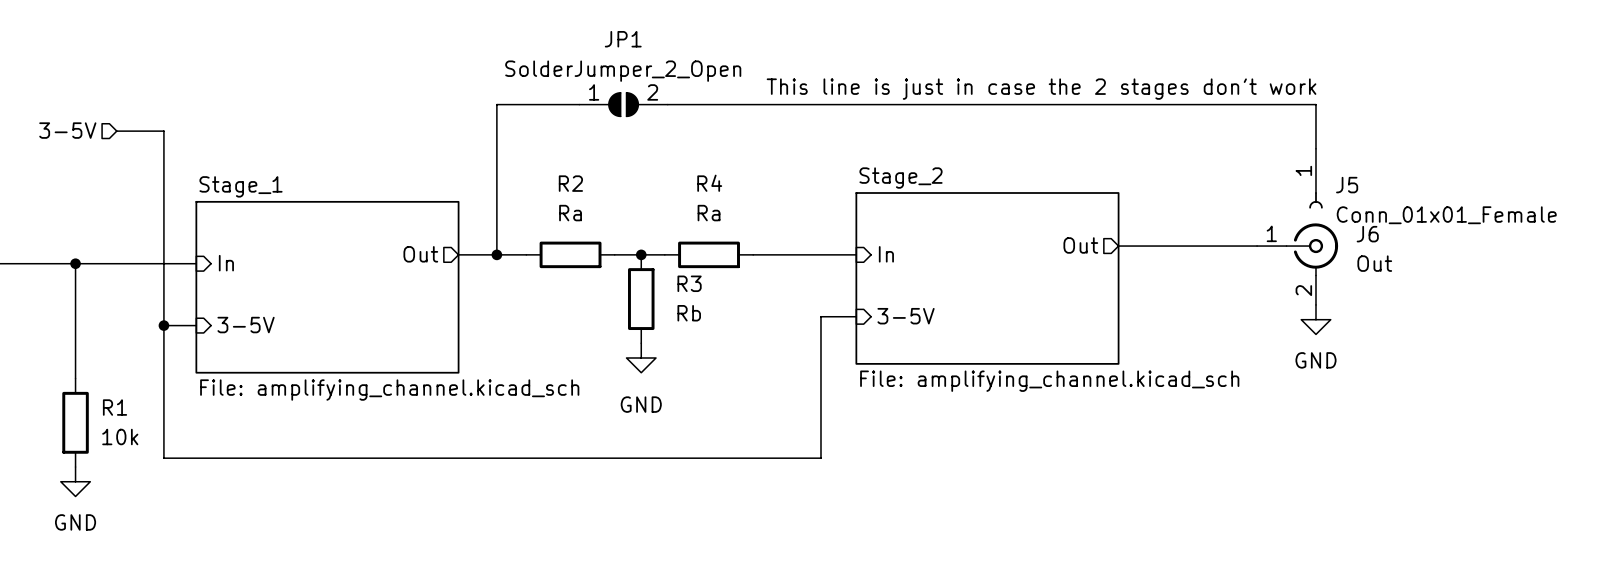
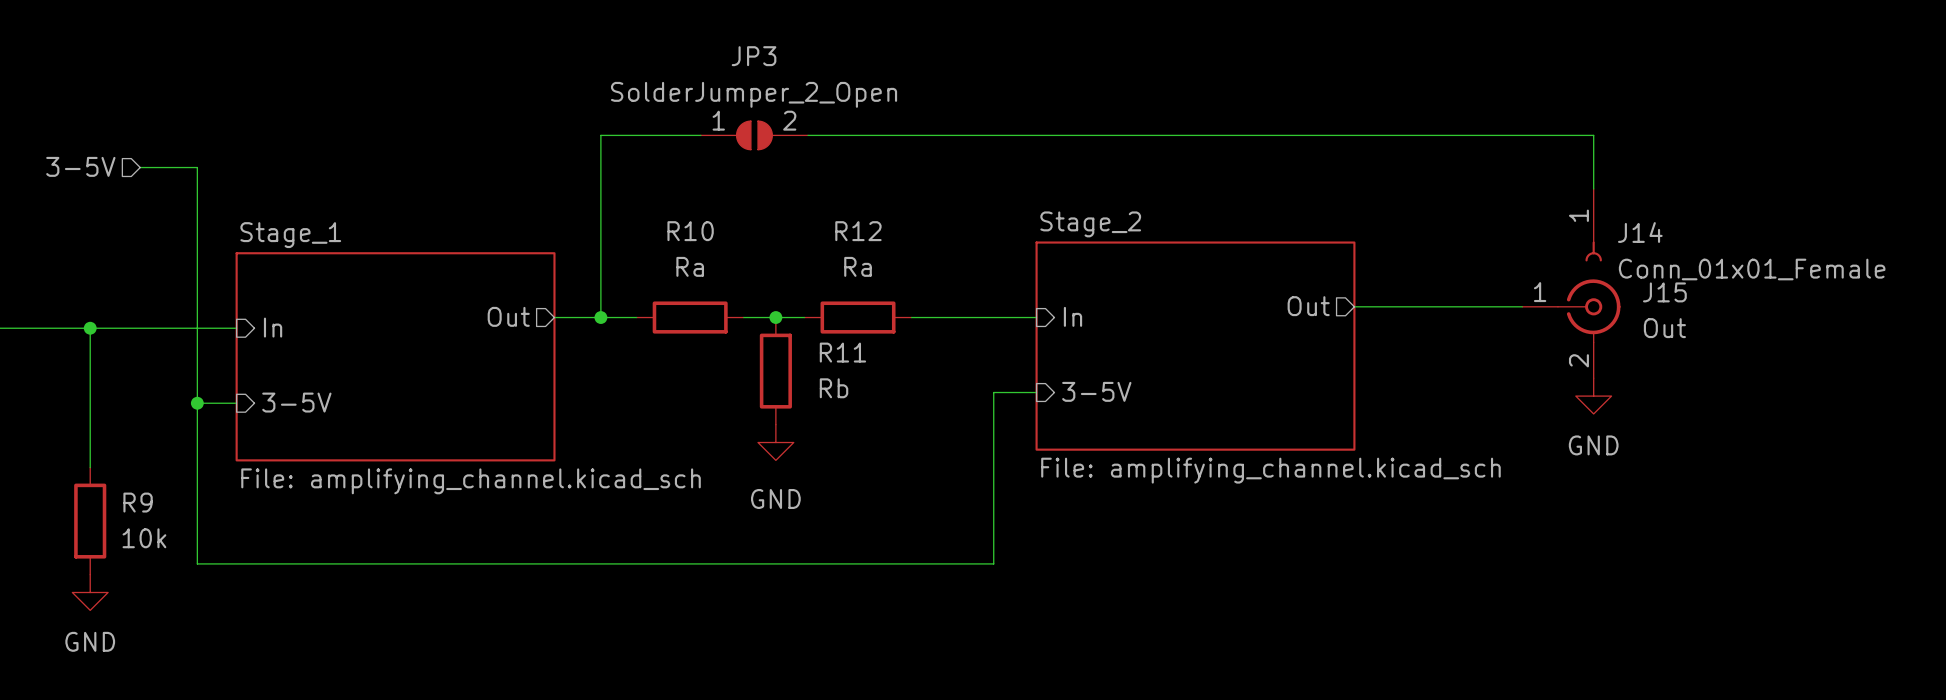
JP1 name: JP1 (623, 39) -> JP3 (754, 56)
text: This line is just in case the 2 stages don't work (1041, 89) -> none
R2 name: R2 (570, 183) -> R10 (690, 231)
R4 name: R4 (709, 183) -> R12 (858, 231)
J5 name: J5 (1347, 185) -> J14 (1640, 232)
J6 name: J6 (1367, 234) -> J15 (1664, 292)
R3 name: R3 (689, 283) -> R11 (842, 352)
R1 name: R1 (115, 407) -> R9 (138, 502)

